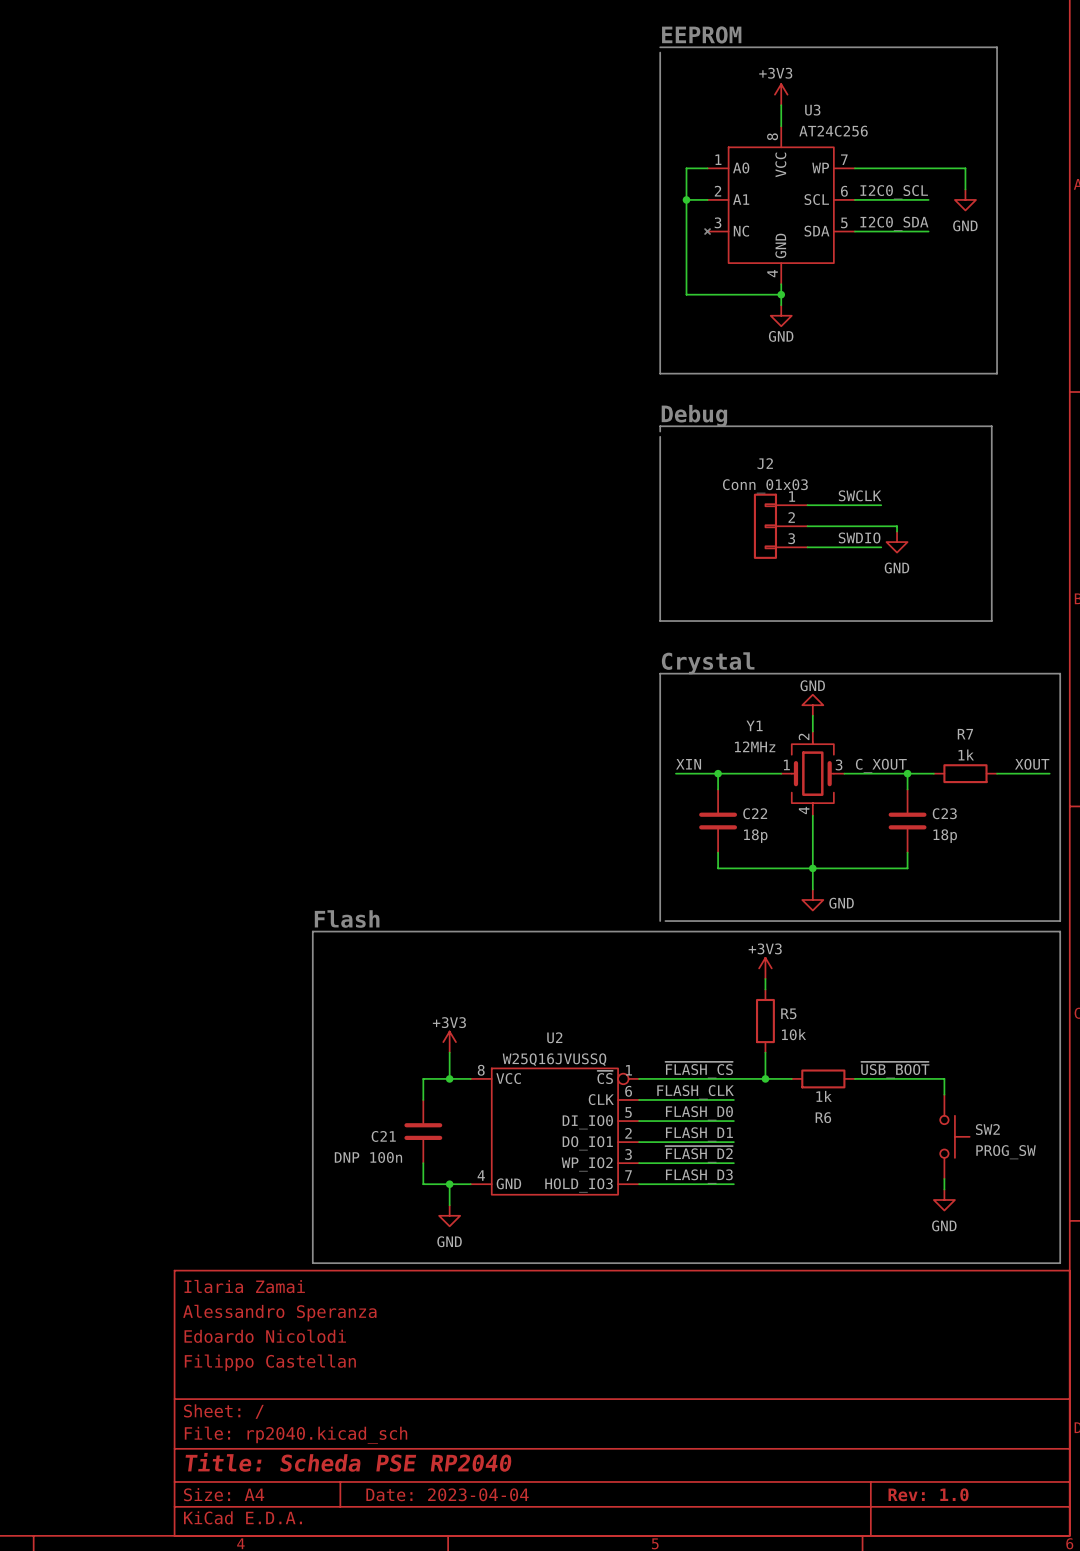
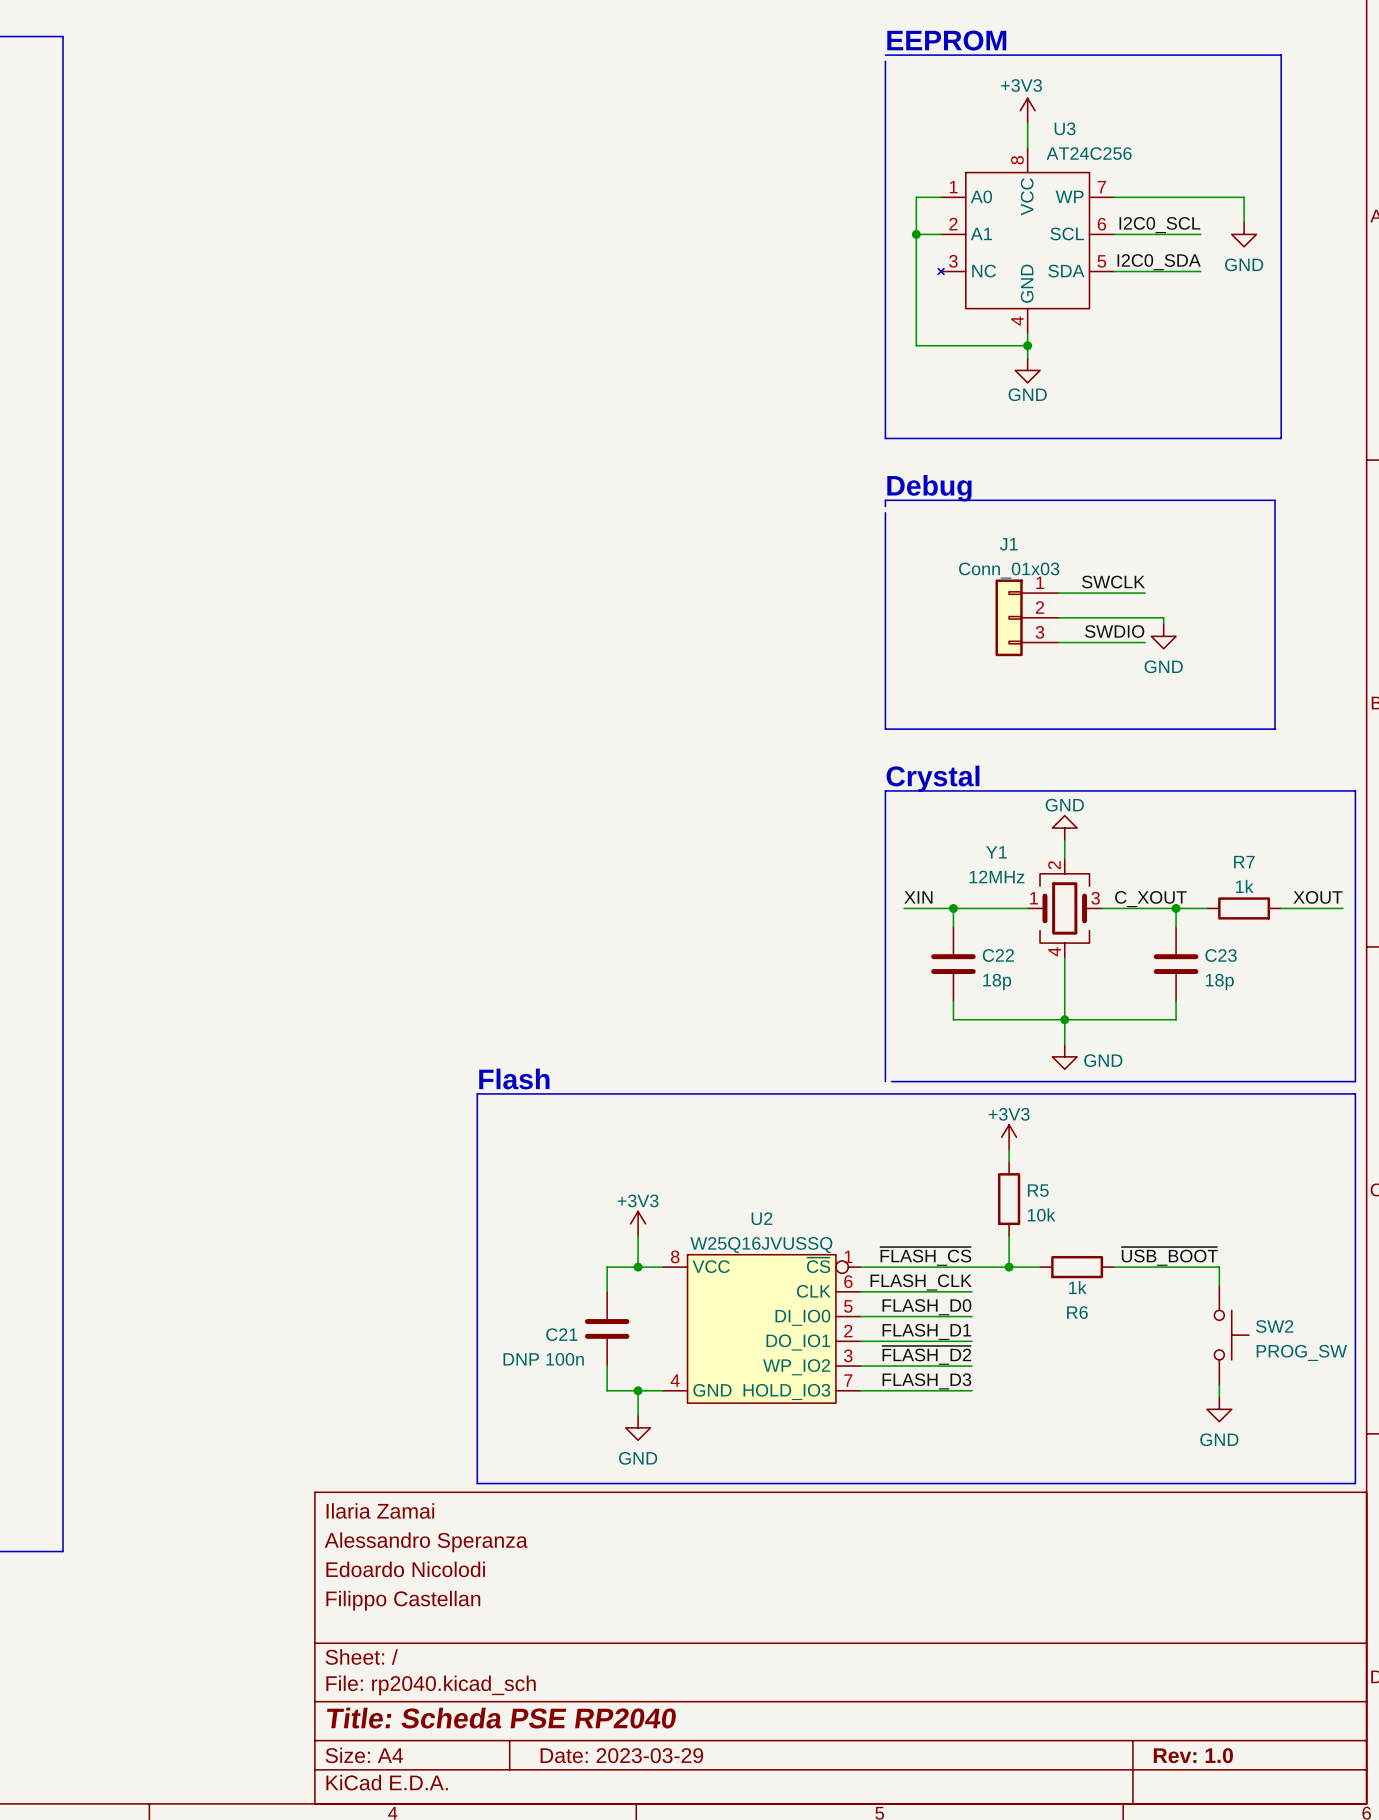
J2 name: J2 (765, 463) -> J1 (1008, 544)
title block: Date: 2023-04-04 (447, 1494) -> Date: 2023-03-29 (621, 1755)

